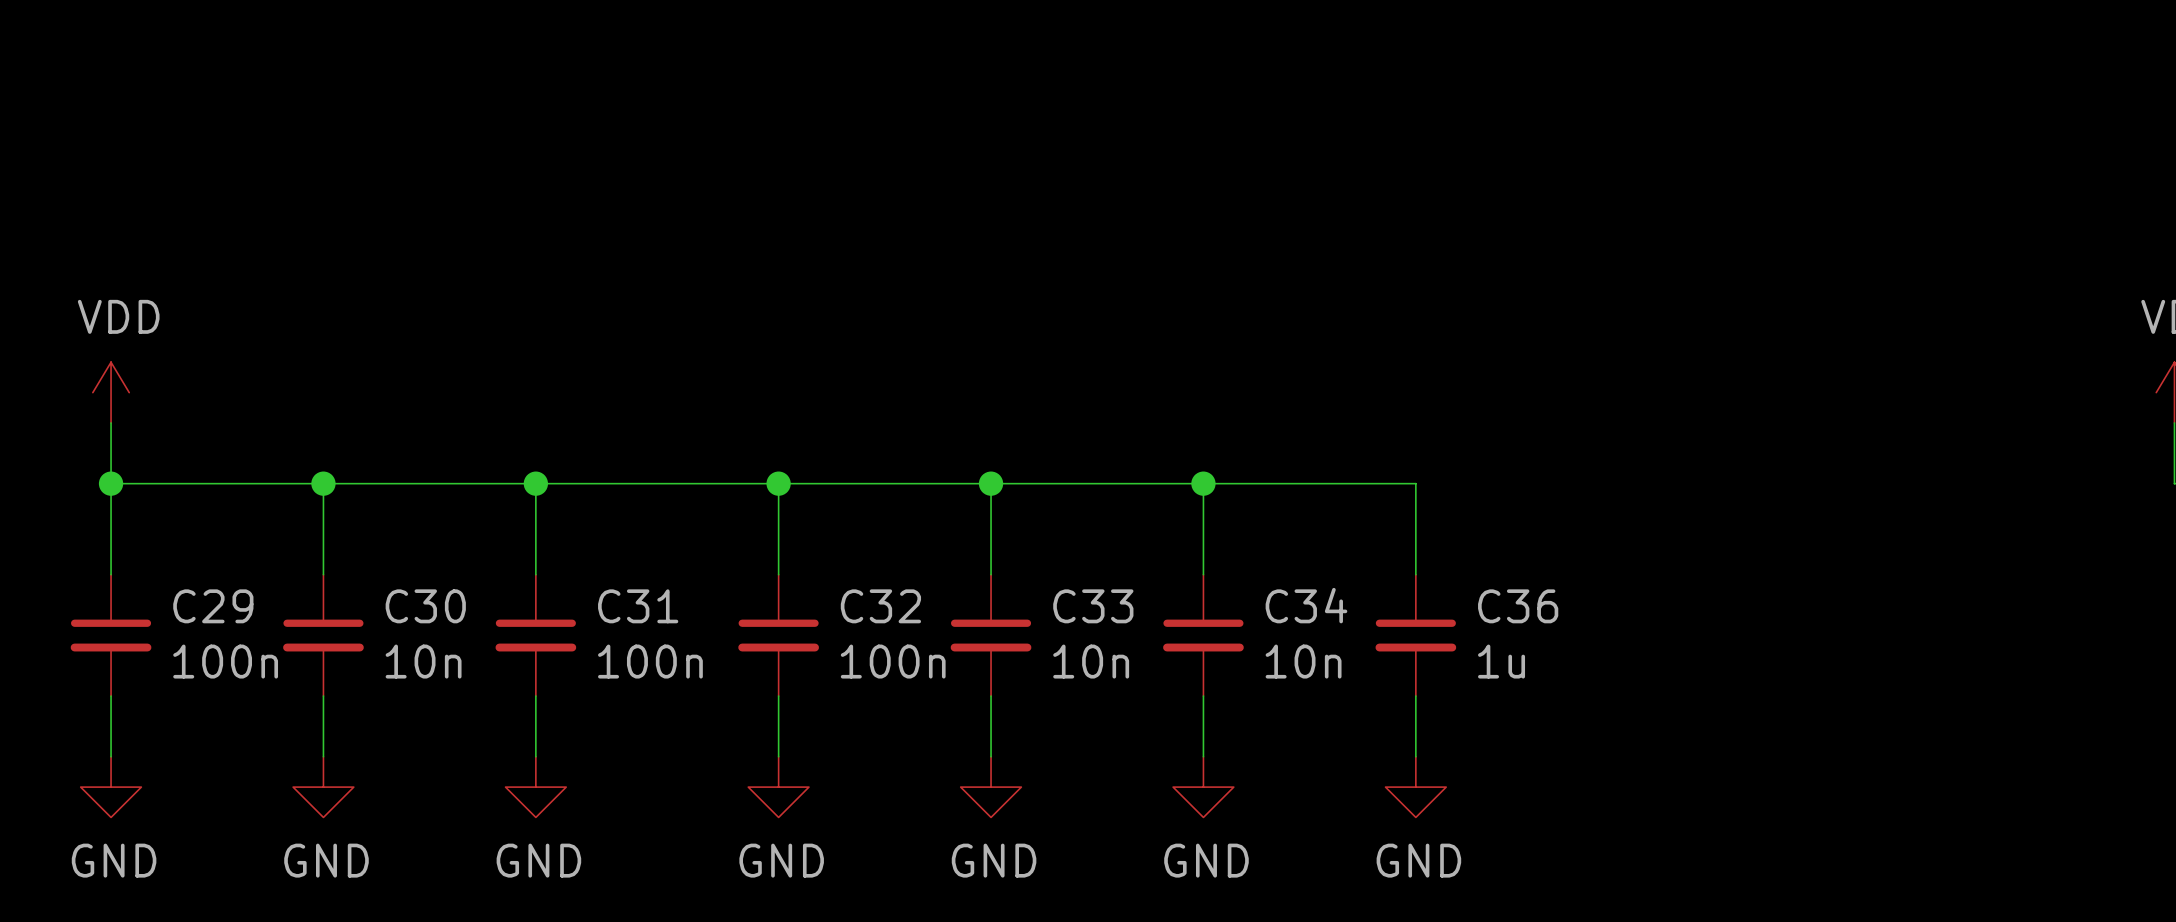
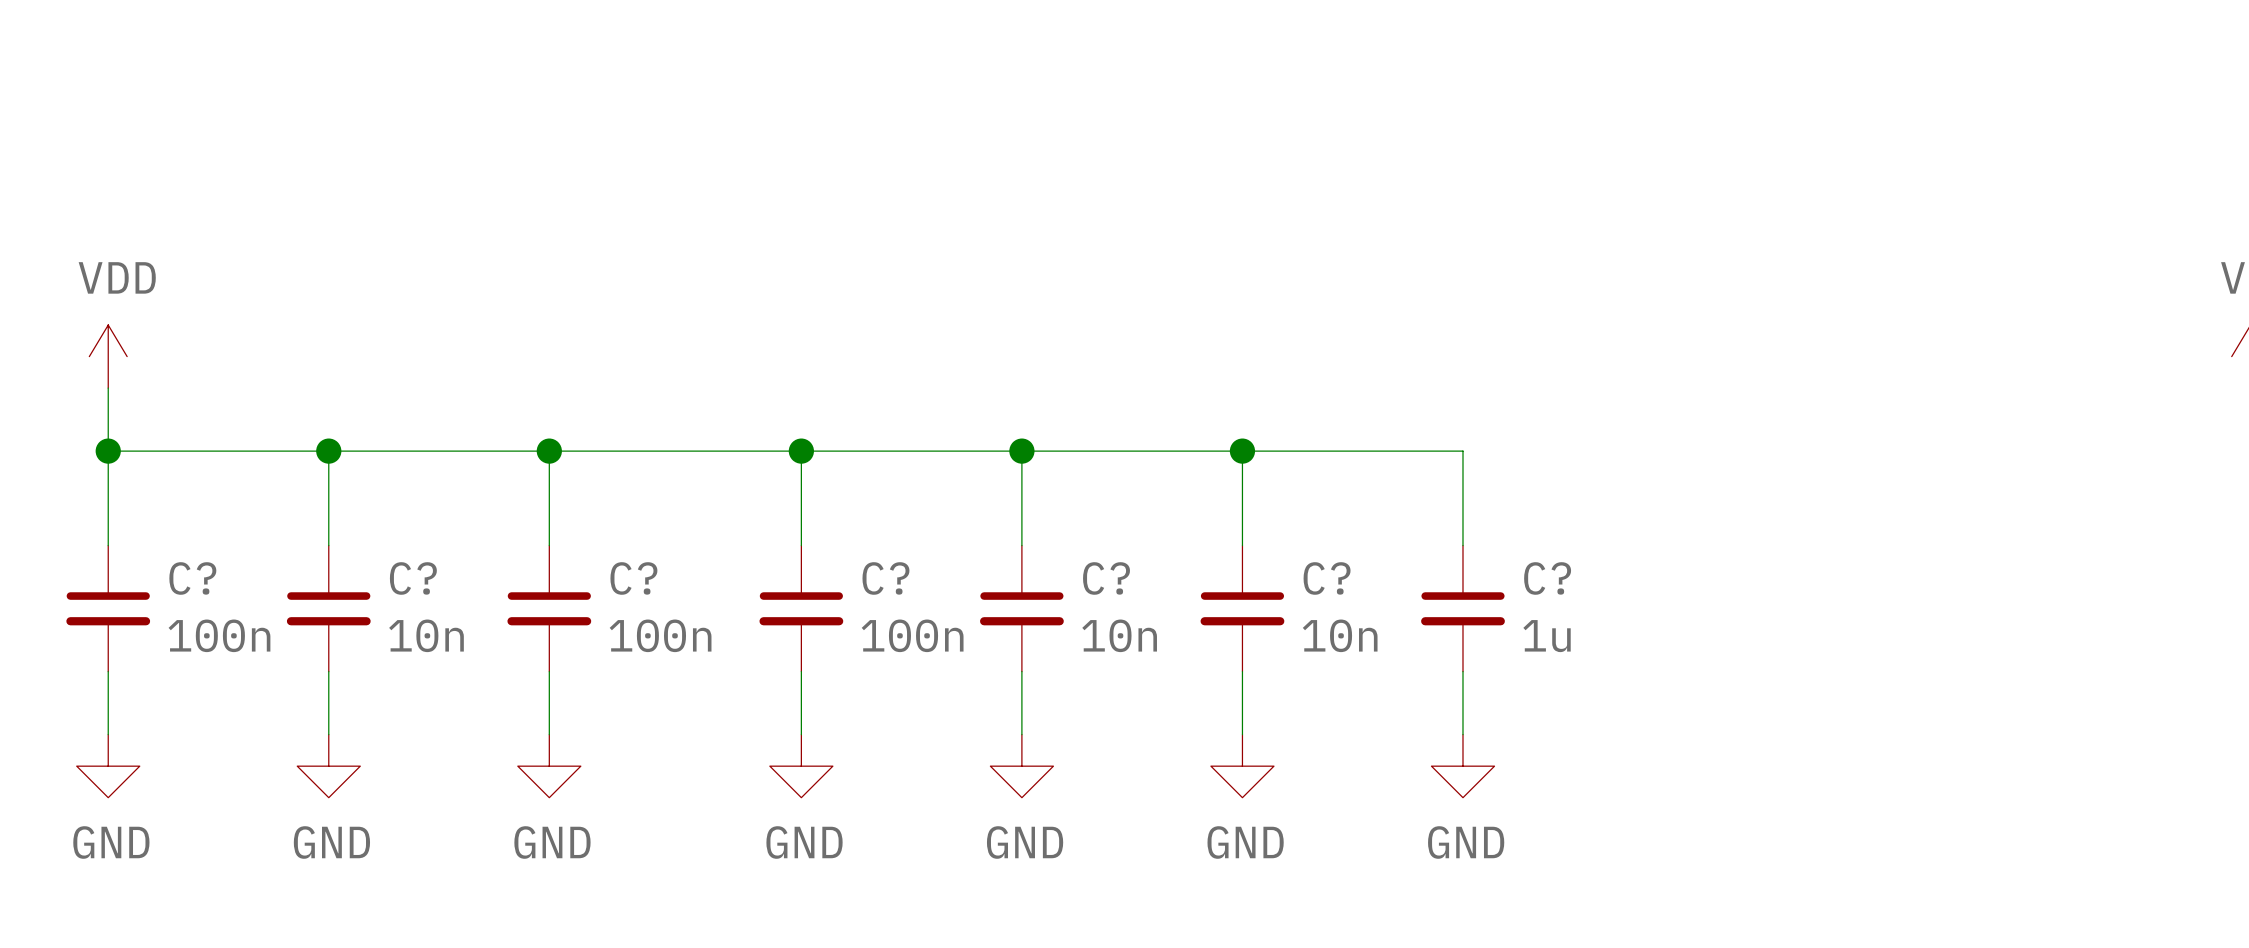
C34 name: C34 (1306, 605) -> C? (1327, 578)
C29 name: C29 (213, 606) -> C? (192, 578)
C30 name: C30 (425, 606) -> C? (413, 578)
C31 name: C31 (638, 606) -> C? (633, 578)
C32 name: C32 (880, 606) -> C? (885, 578)
C33 name: C33 (1093, 606) -> C? (1106, 578)
C36 name: C36 (1518, 606) -> C? (1547, 578)

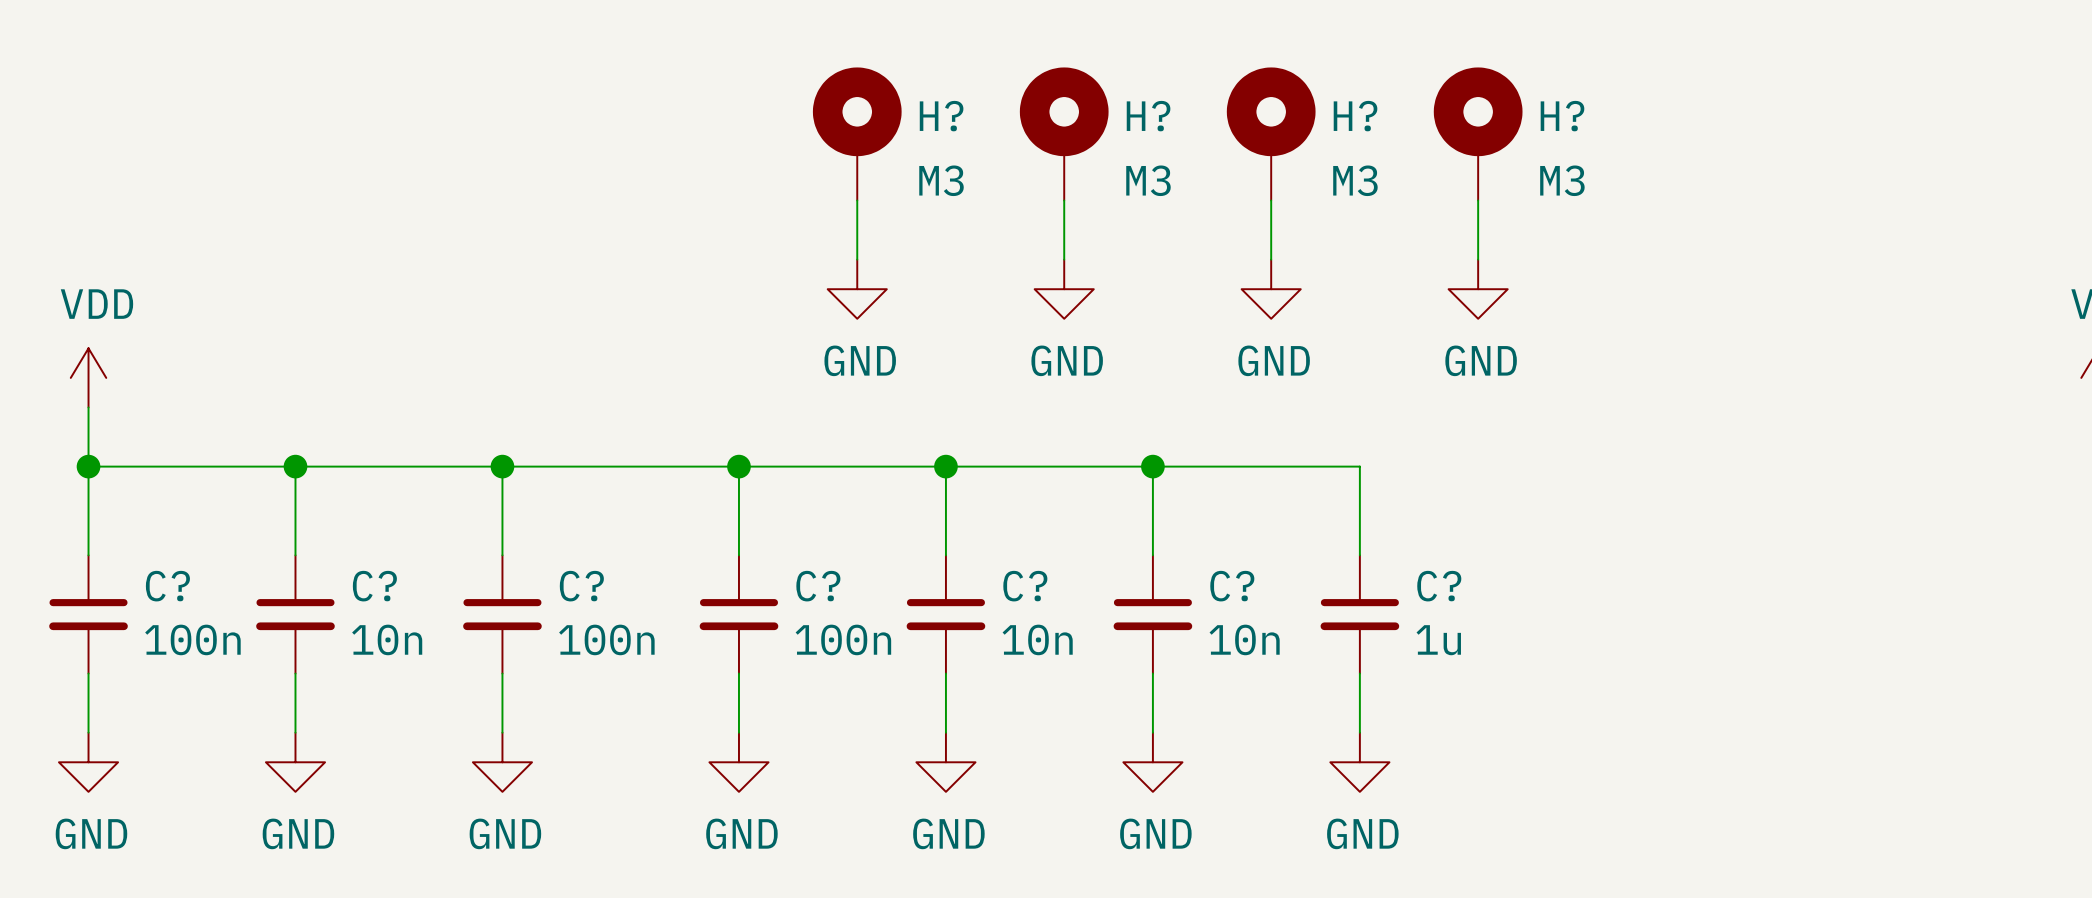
H?: none -> M3 (857, 133)
H?: none -> M3 (1064, 133)
H?: none -> M3 (1271, 133)
H?: none -> M3 (1478, 133)
wire: none -> (857, 200) (857, 259)
wire: none -> (1064, 200) (1064, 259)
wire: none -> (1271, 200) (1271, 259)
wire: none -> (1478, 200) (1478, 259)
power symbol: none -> GND (857, 289)
power symbol: none -> GND (1064, 289)
power symbol: none -> GND (1271, 289)
power symbol: none -> GND (1478, 289)

